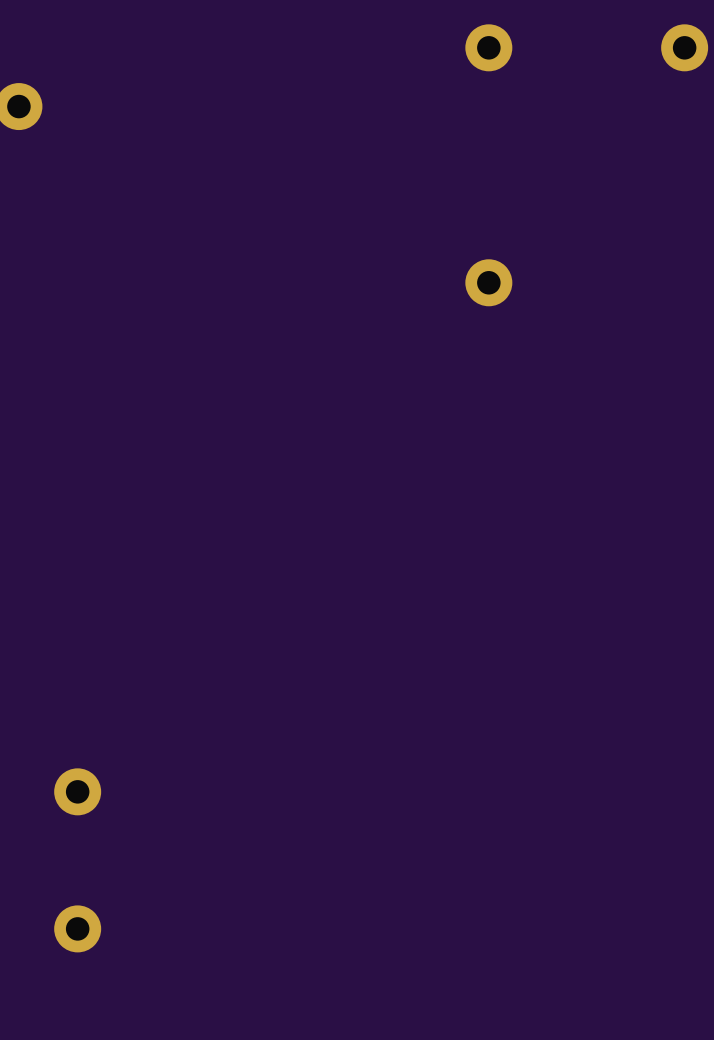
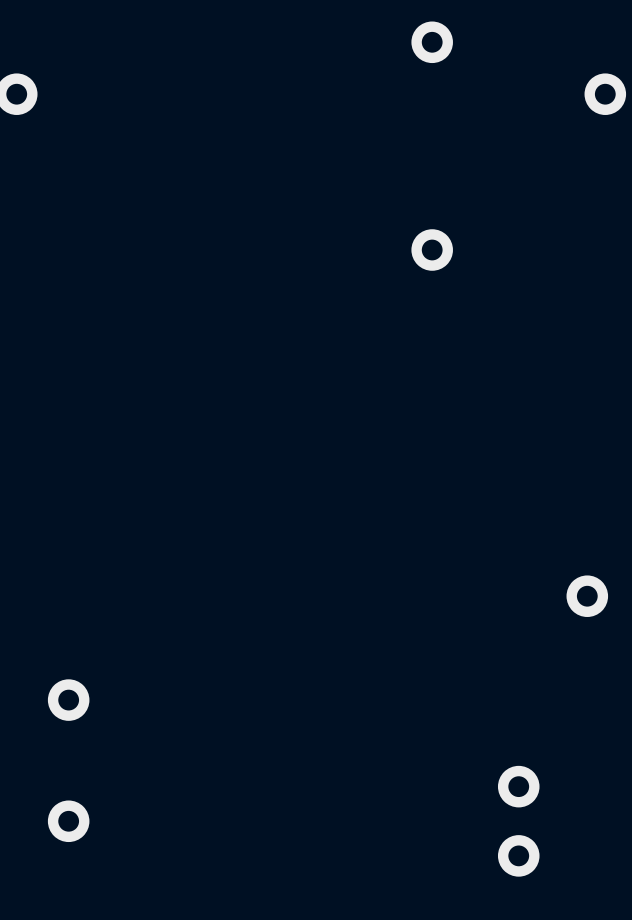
via position: (684, 47) -> (605, 94)
via: none -> (587, 596)
via: none -> (518, 786)
via: none -> (518, 855)

